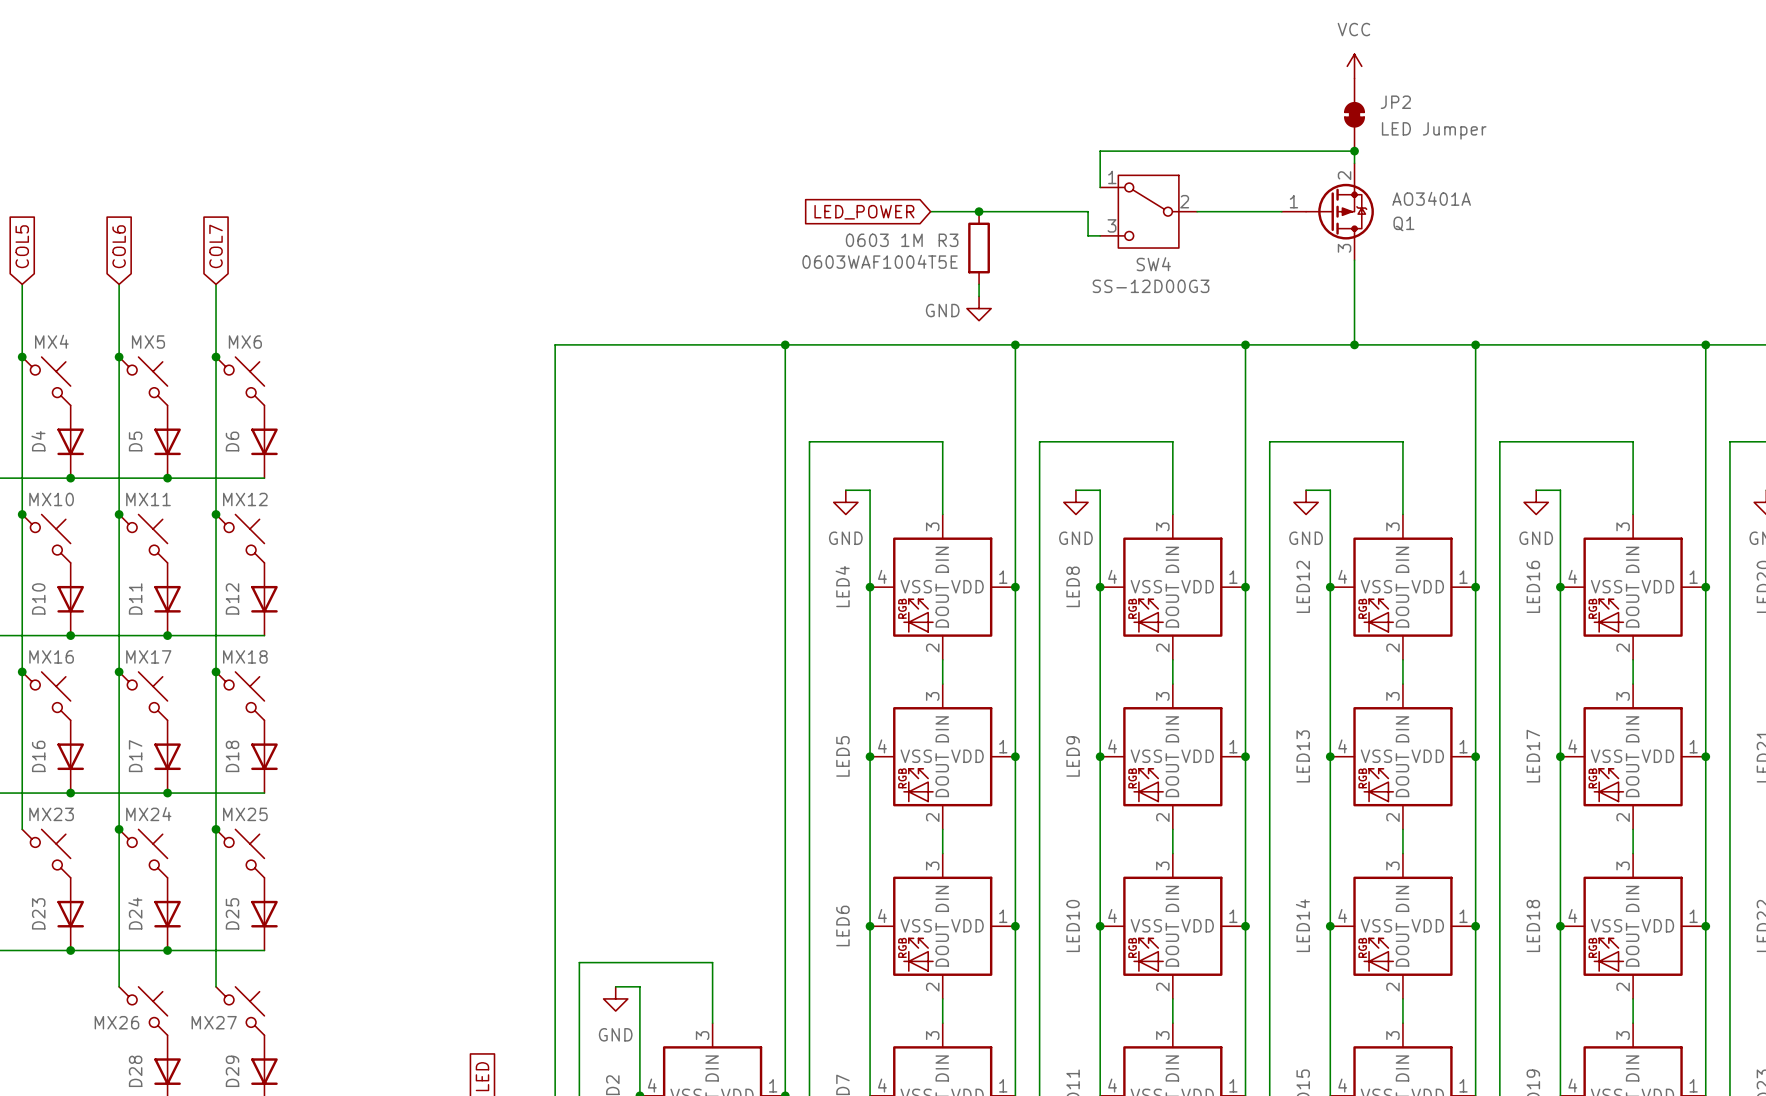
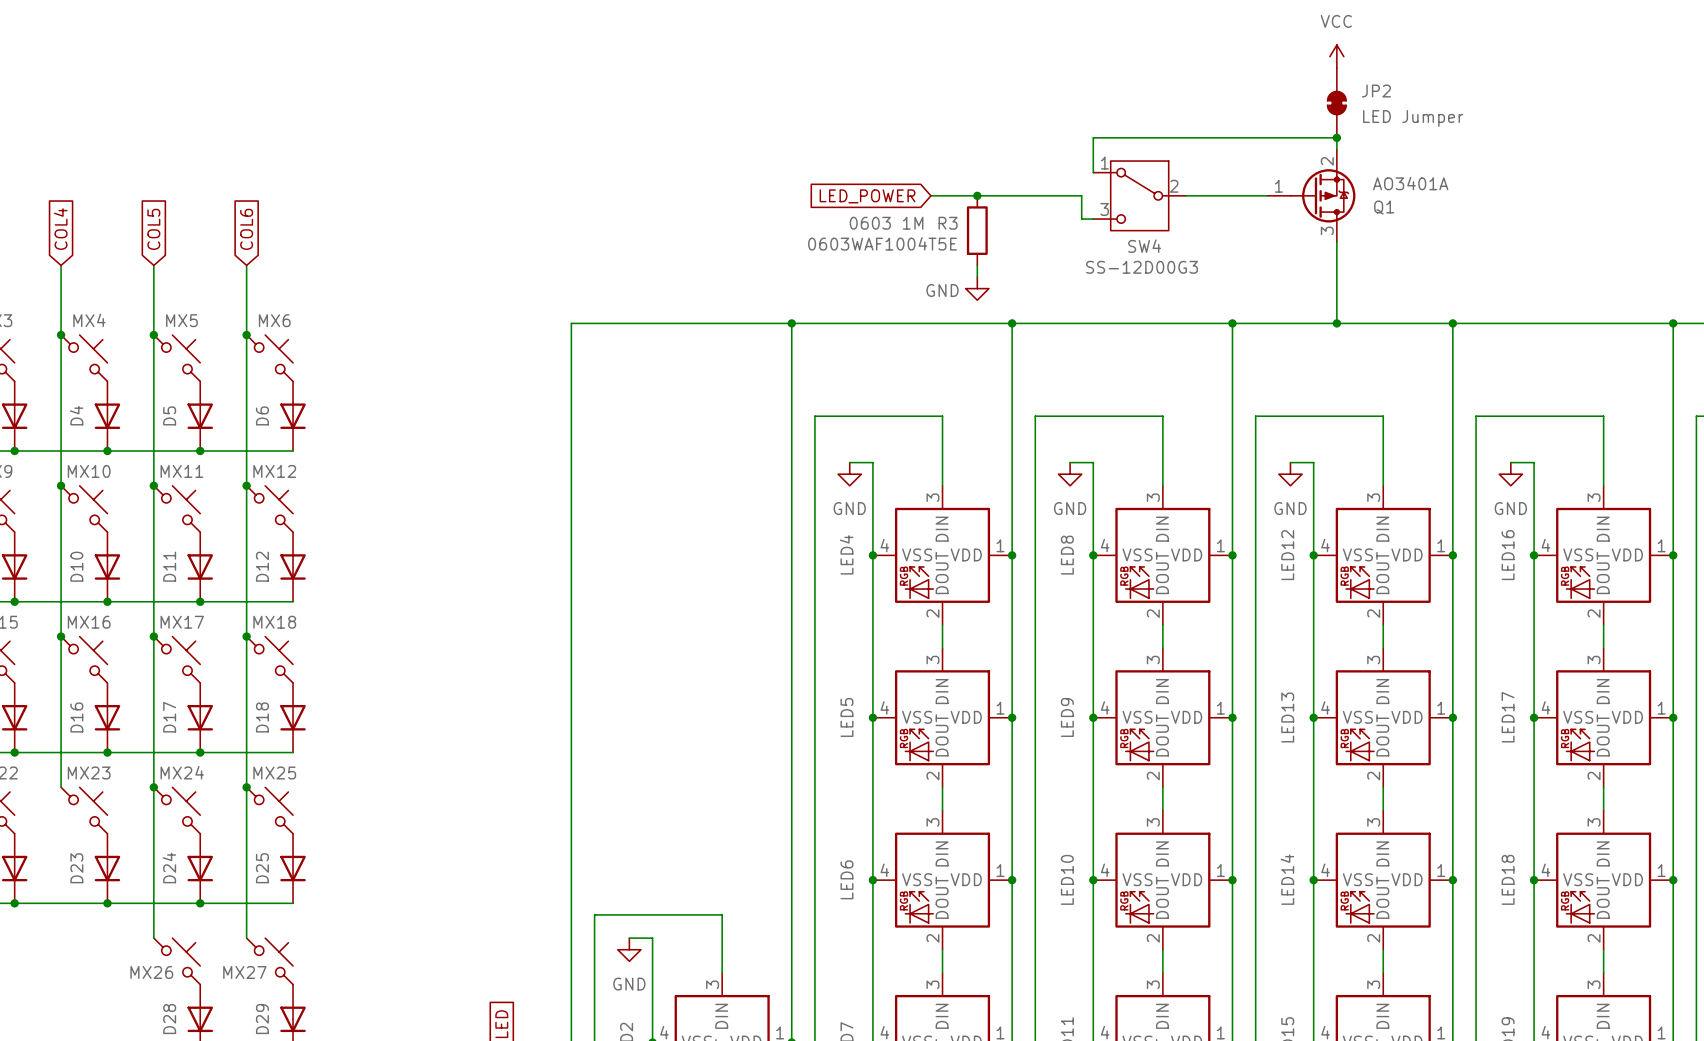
global label: COL5 (22, 246) -> COL4 (60, 229)
global label: COL6 (119, 246) -> COL5 (153, 229)
global label: COL7 (216, 246) -> COL6 (246, 229)

